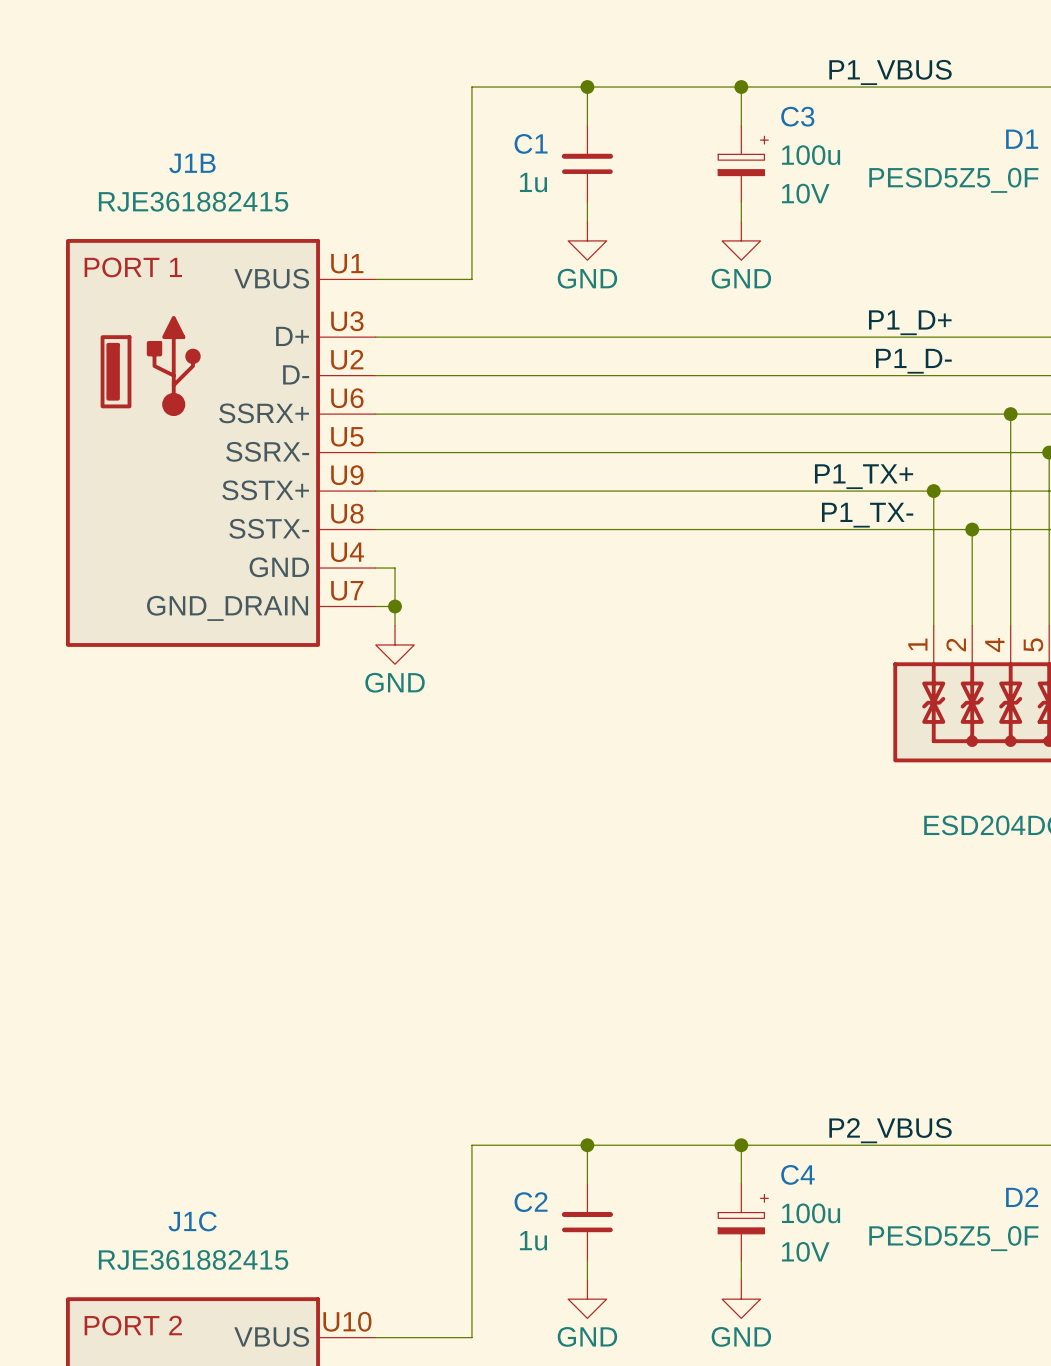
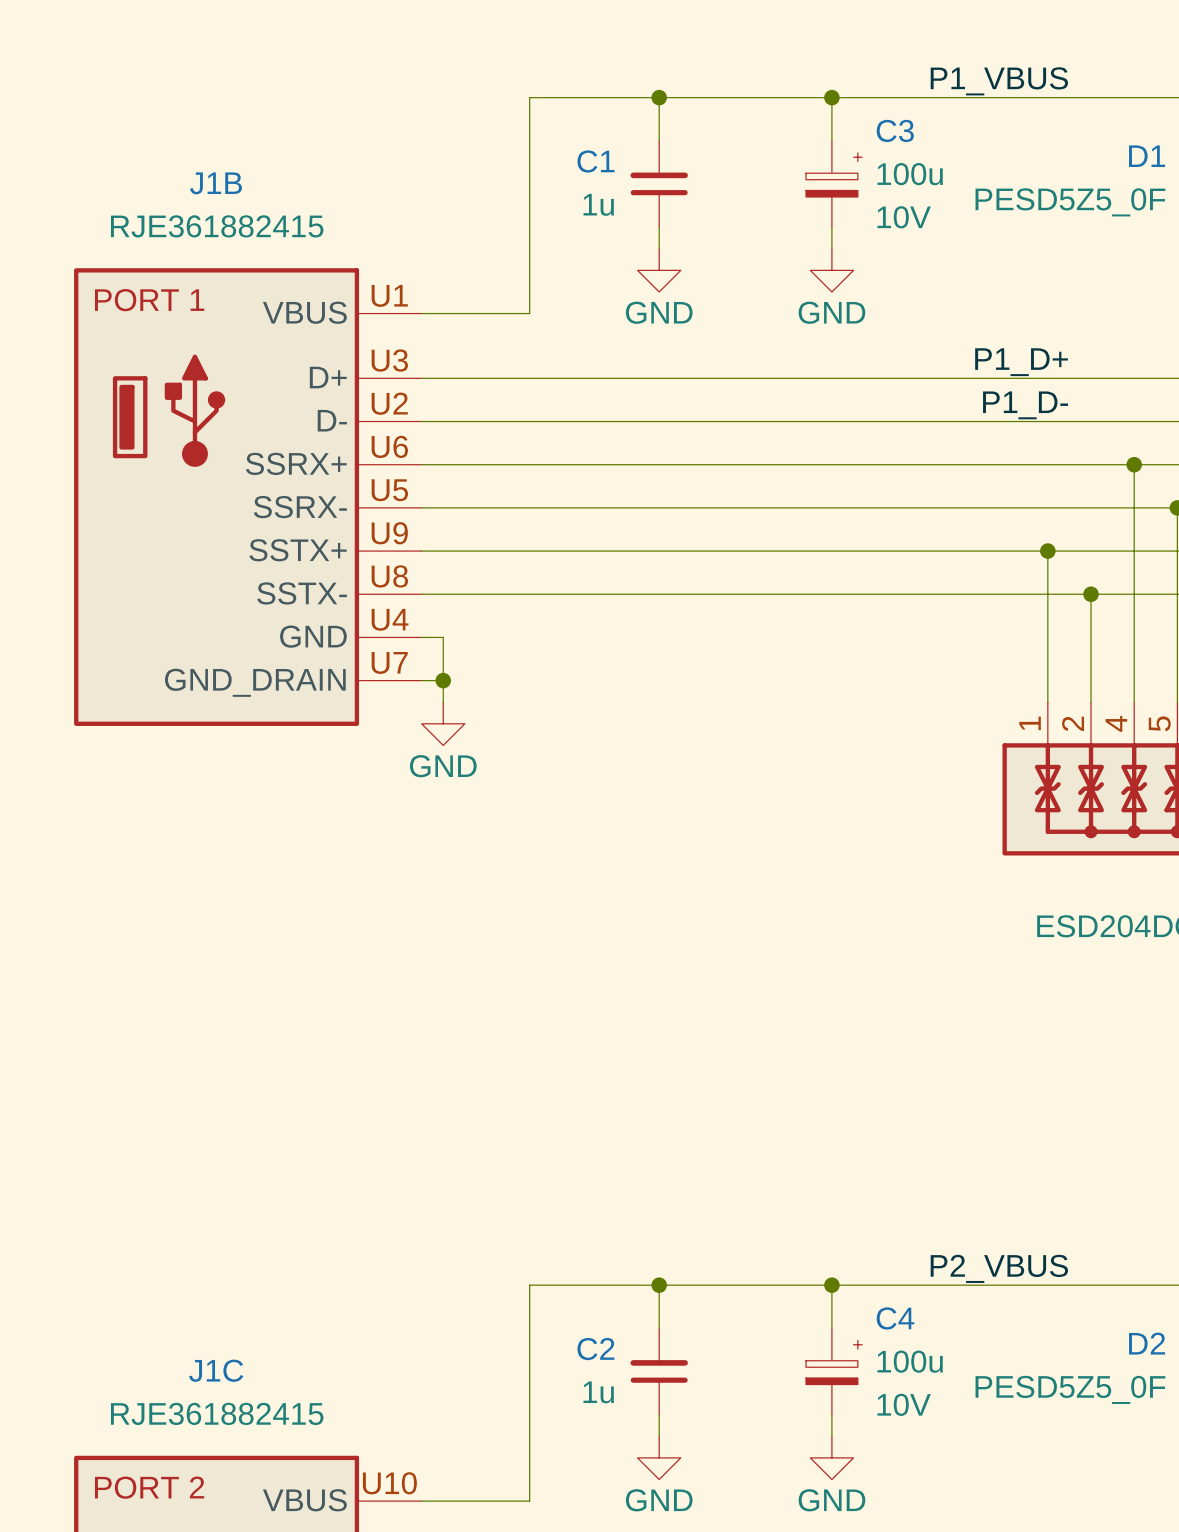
label: P1_TX+ (864, 476) -> none
label: P1_TX- (867, 515) -> none

